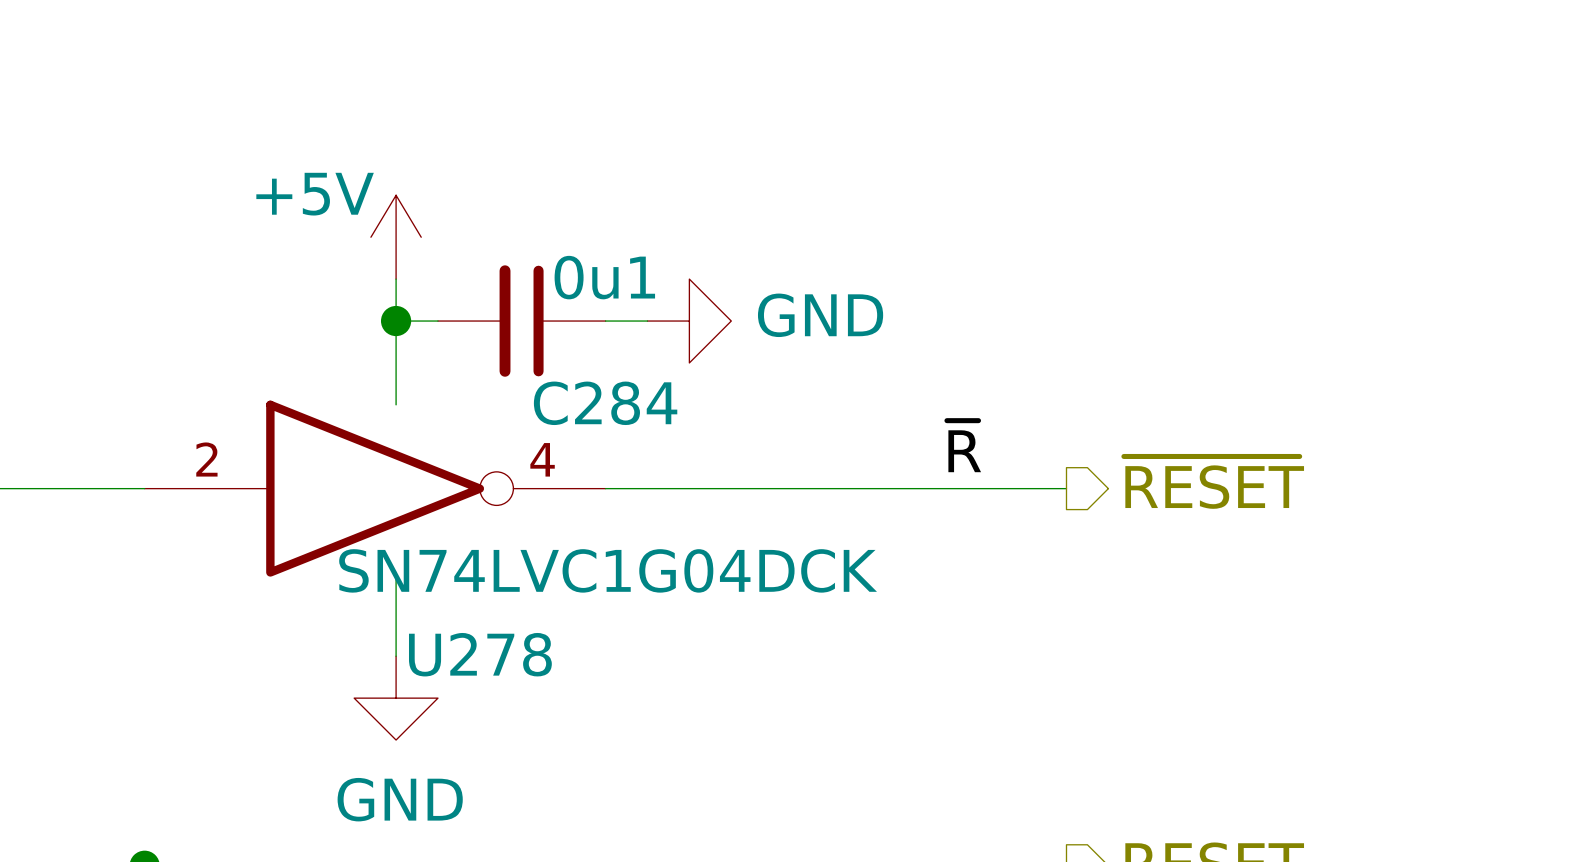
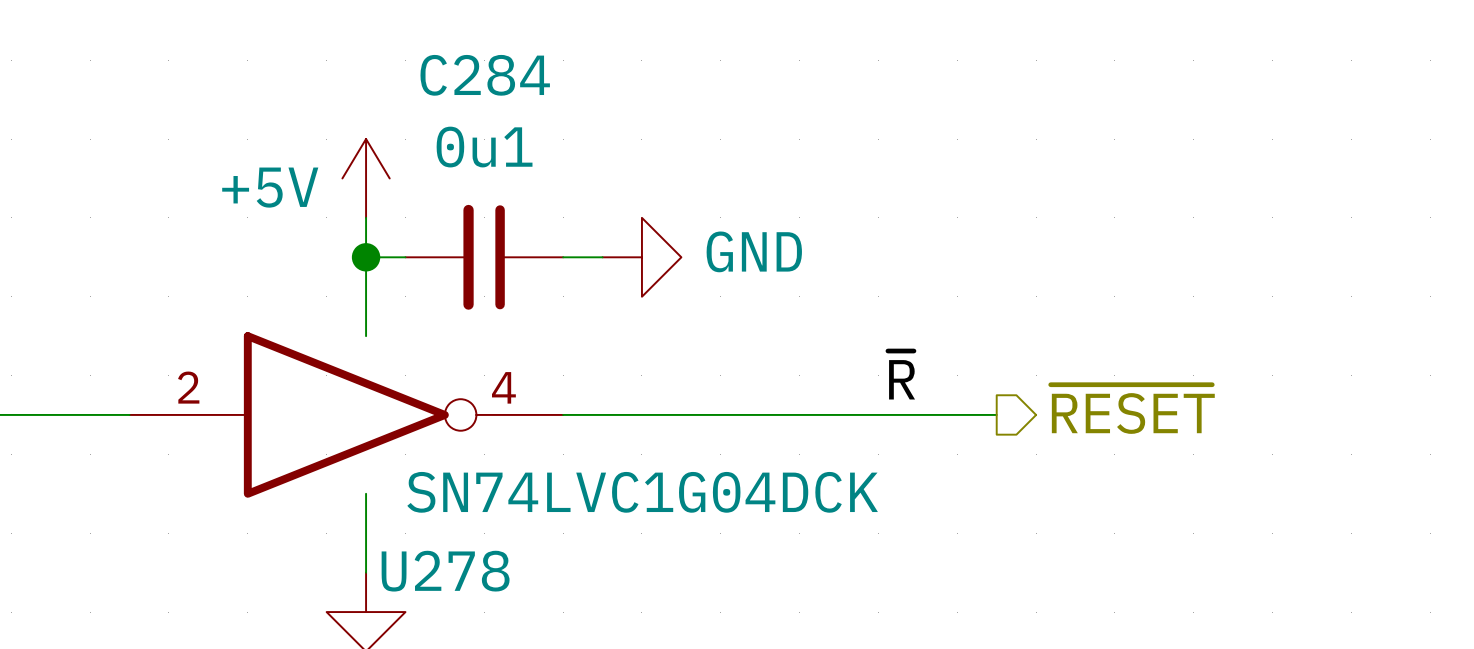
power symbol text position: +5V (315, 194) -> +5V (270, 187)
C284 value position: 0u1 (604, 277) -> 0u1 (484, 147)
C284 name position: C284 (605, 403) -> C284 (485, 75)
U278 value position: SN74LVC1G04DCK (608, 570) -> SN74LVC1G04DCK (642, 492)

